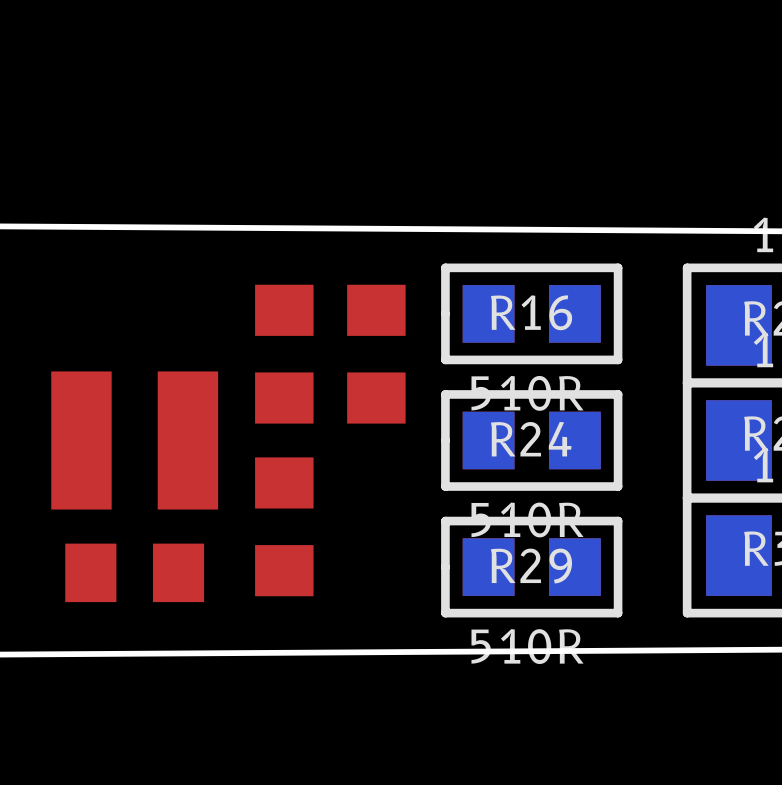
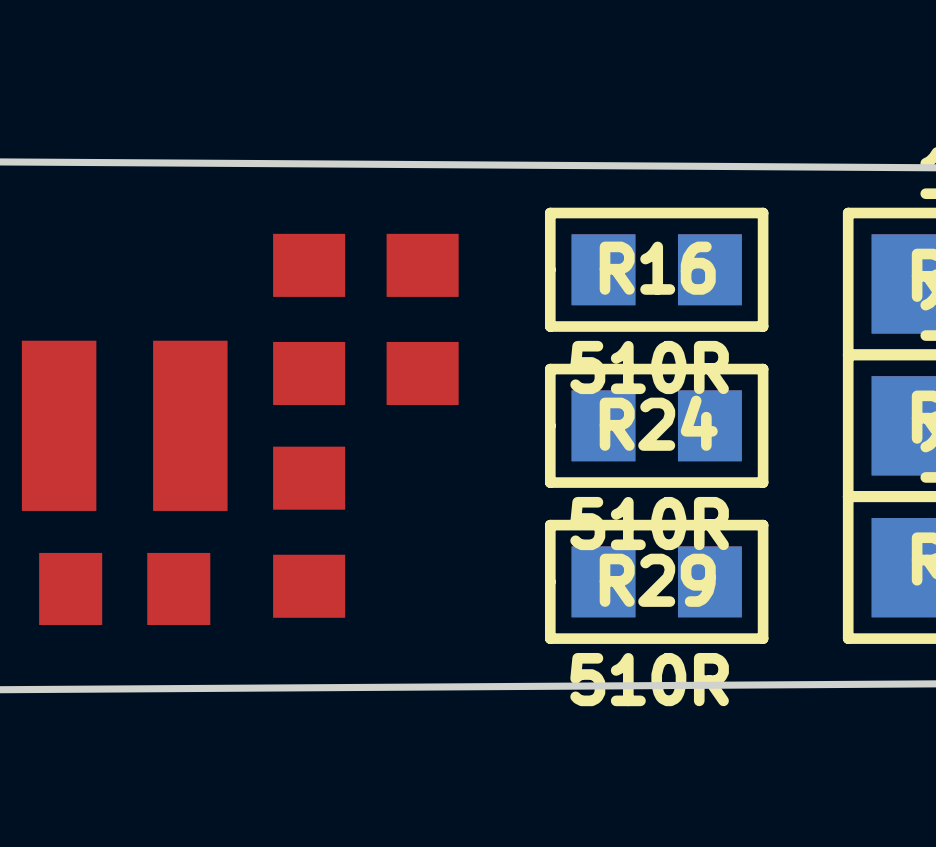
part: none -> (309, 319)
part: (284, 354) -> none
part: none -> (422, 319)
part: (376, 354) -> none
part position: (134, 440) -> (124, 425)
part position: (284, 526) -> (309, 532)
part position: (134, 572) -> (124, 588)

